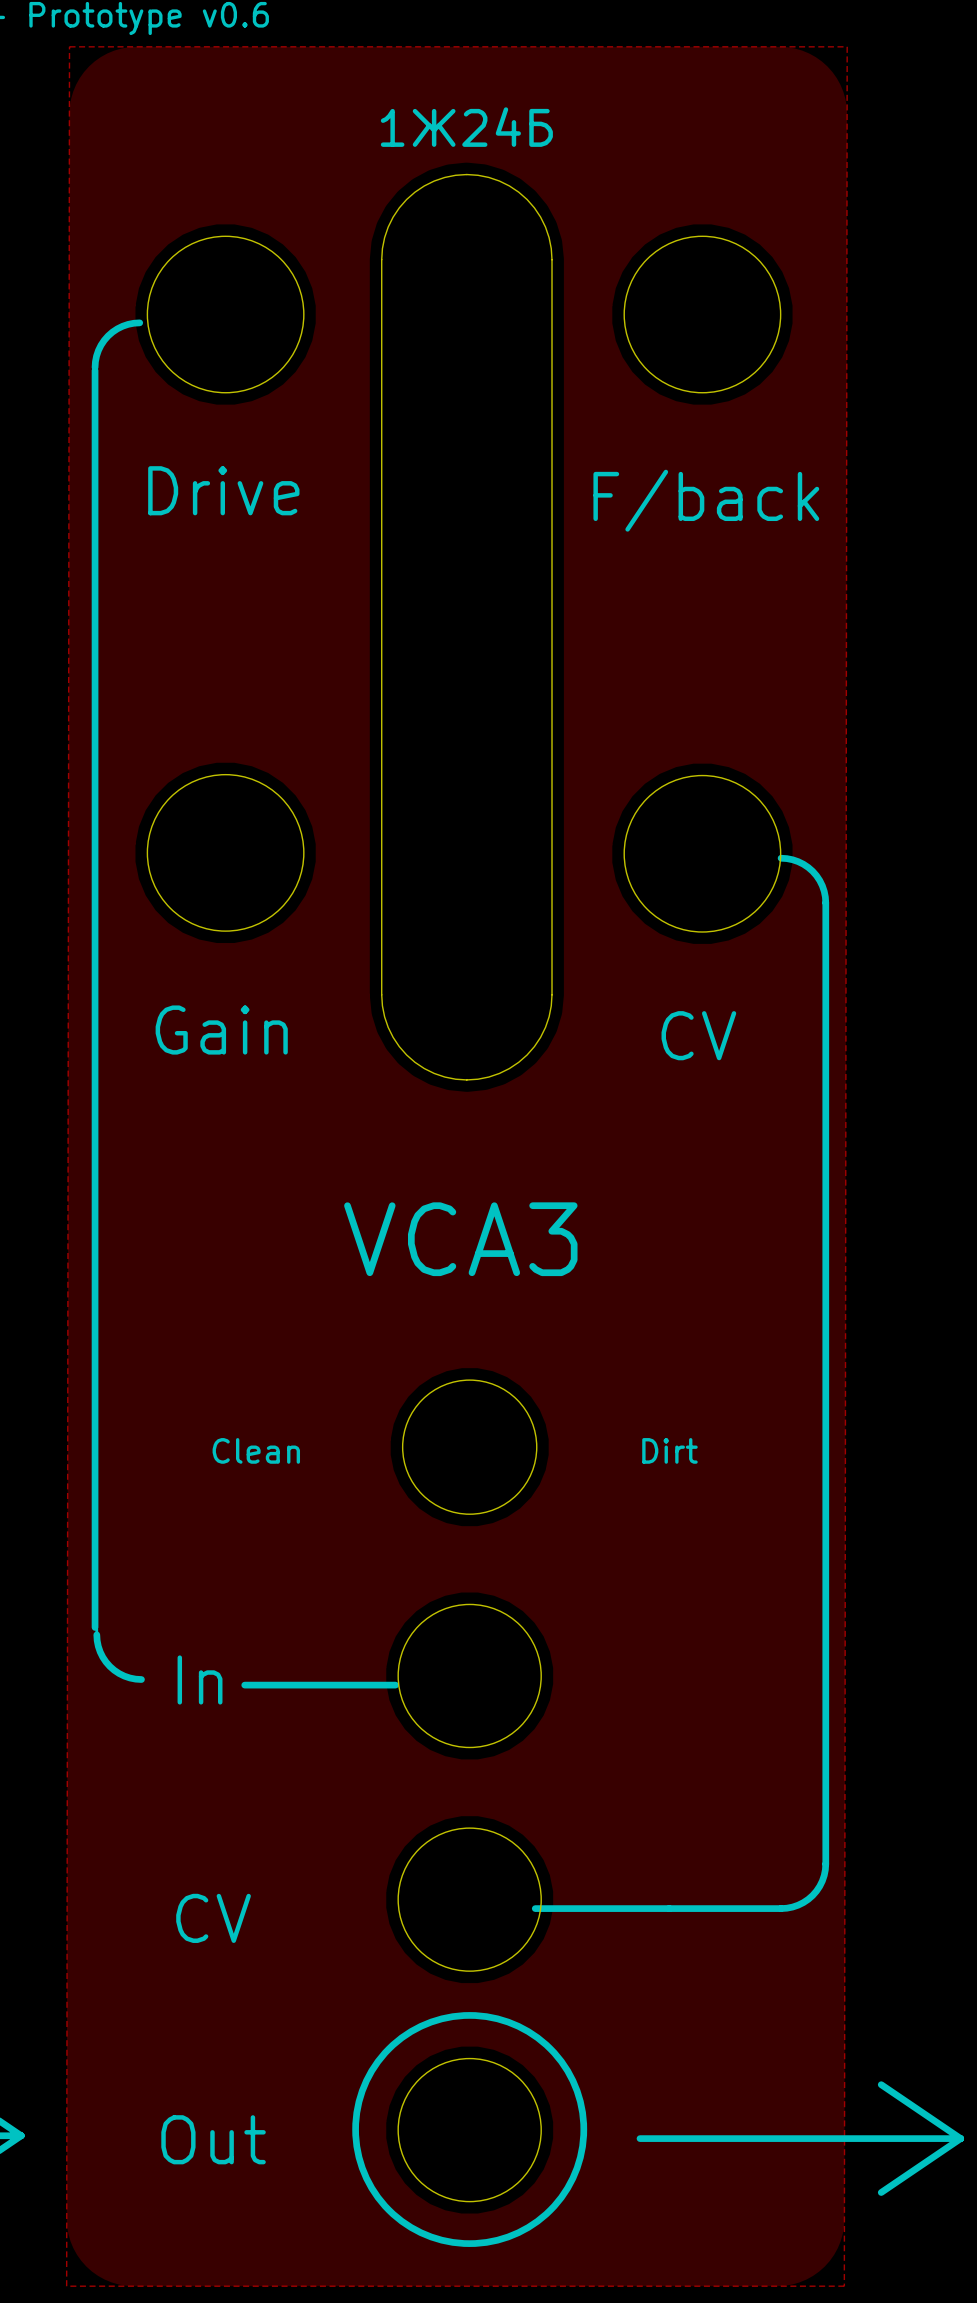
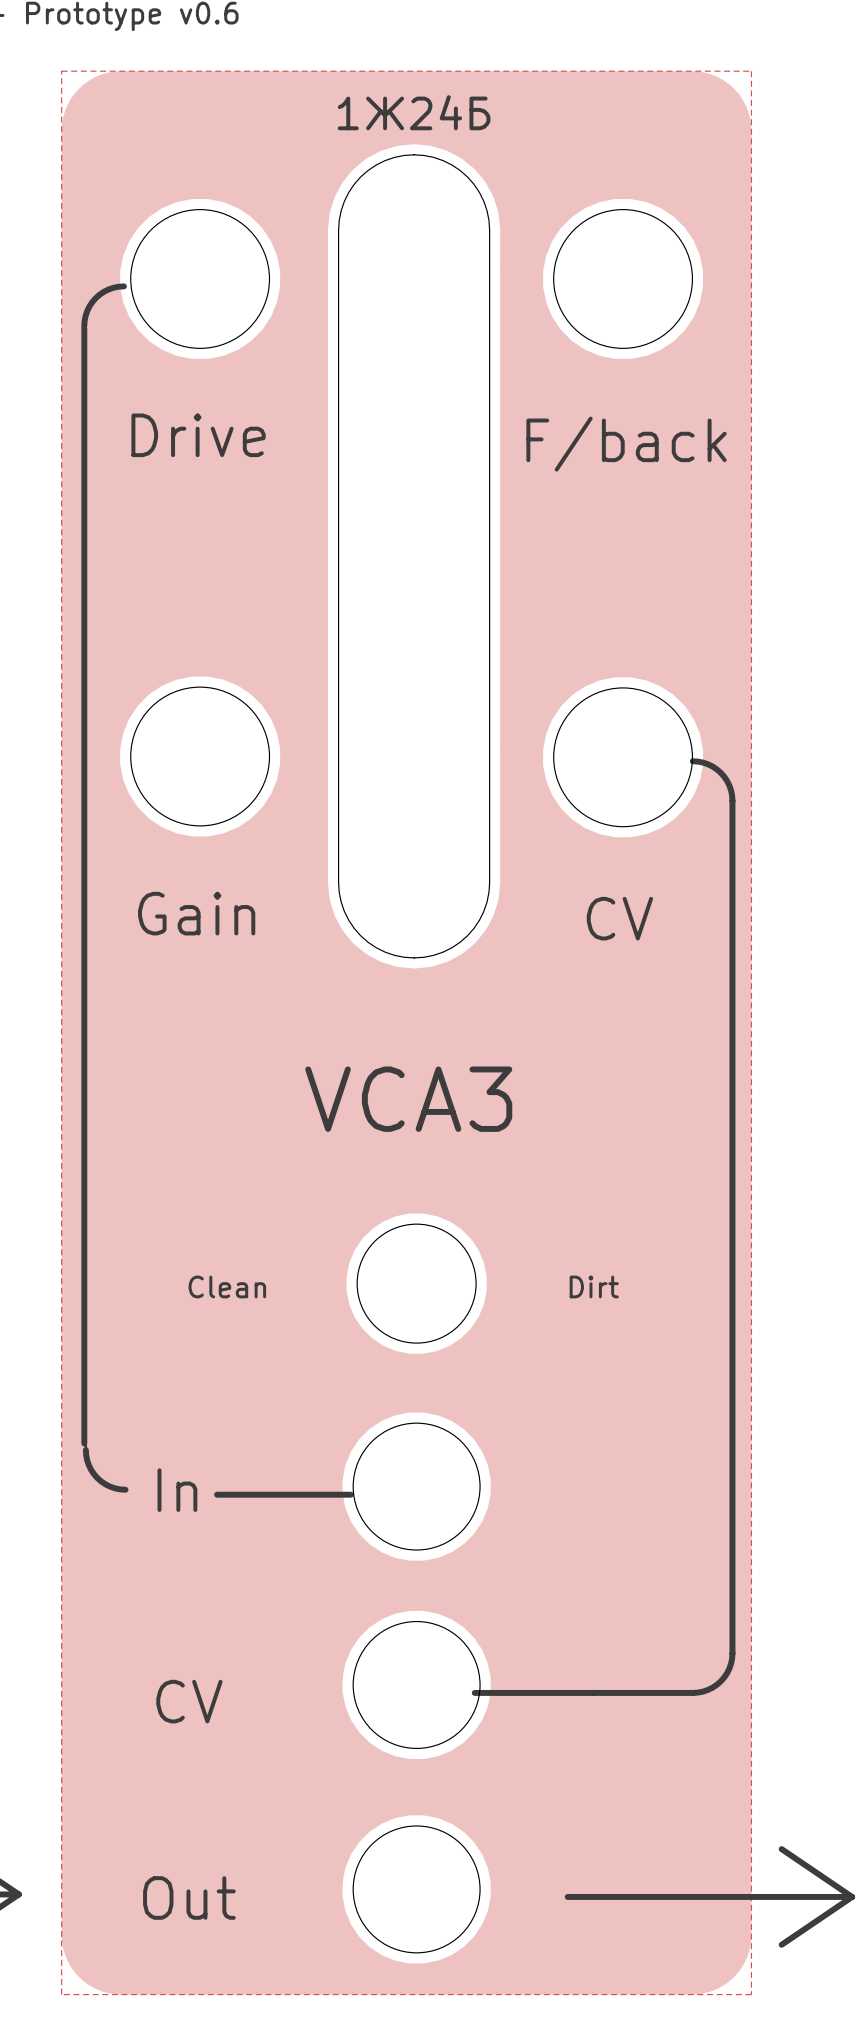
zone outline: (69, 46) (66, 2286) (844, 2286) (847, 46) (69, 46) -> (61, 71) (61, 1994) (751, 1994) (751, 71) (61, 71)
drawing: [352, 2012, 588, 2247] -> none

